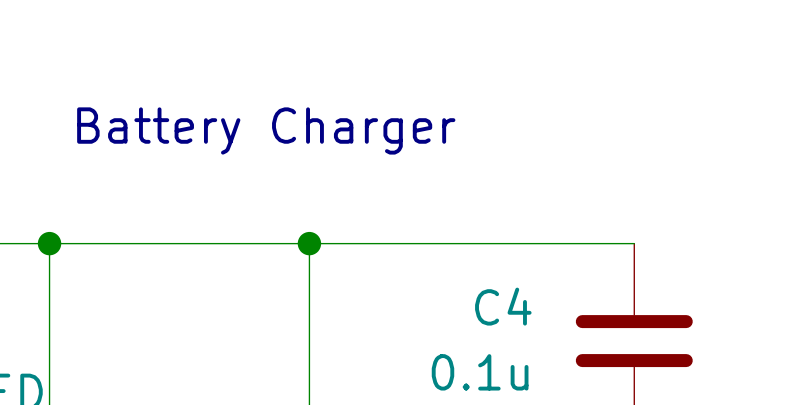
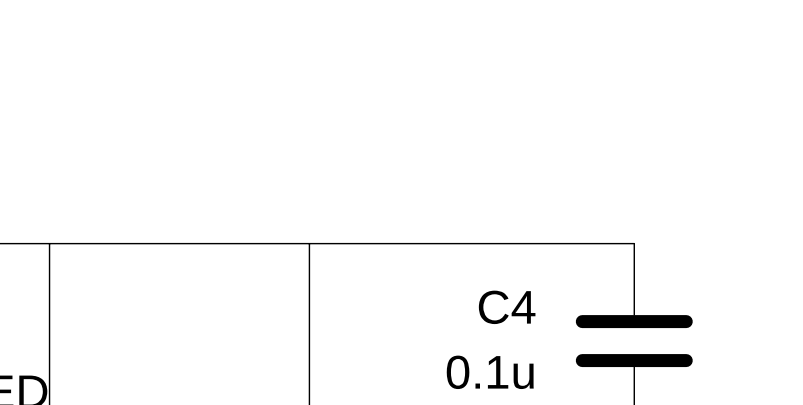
text: Battery Charger (266, 130) -> none
junction: (49, 243) -> none
junction: (309, 243) -> none

